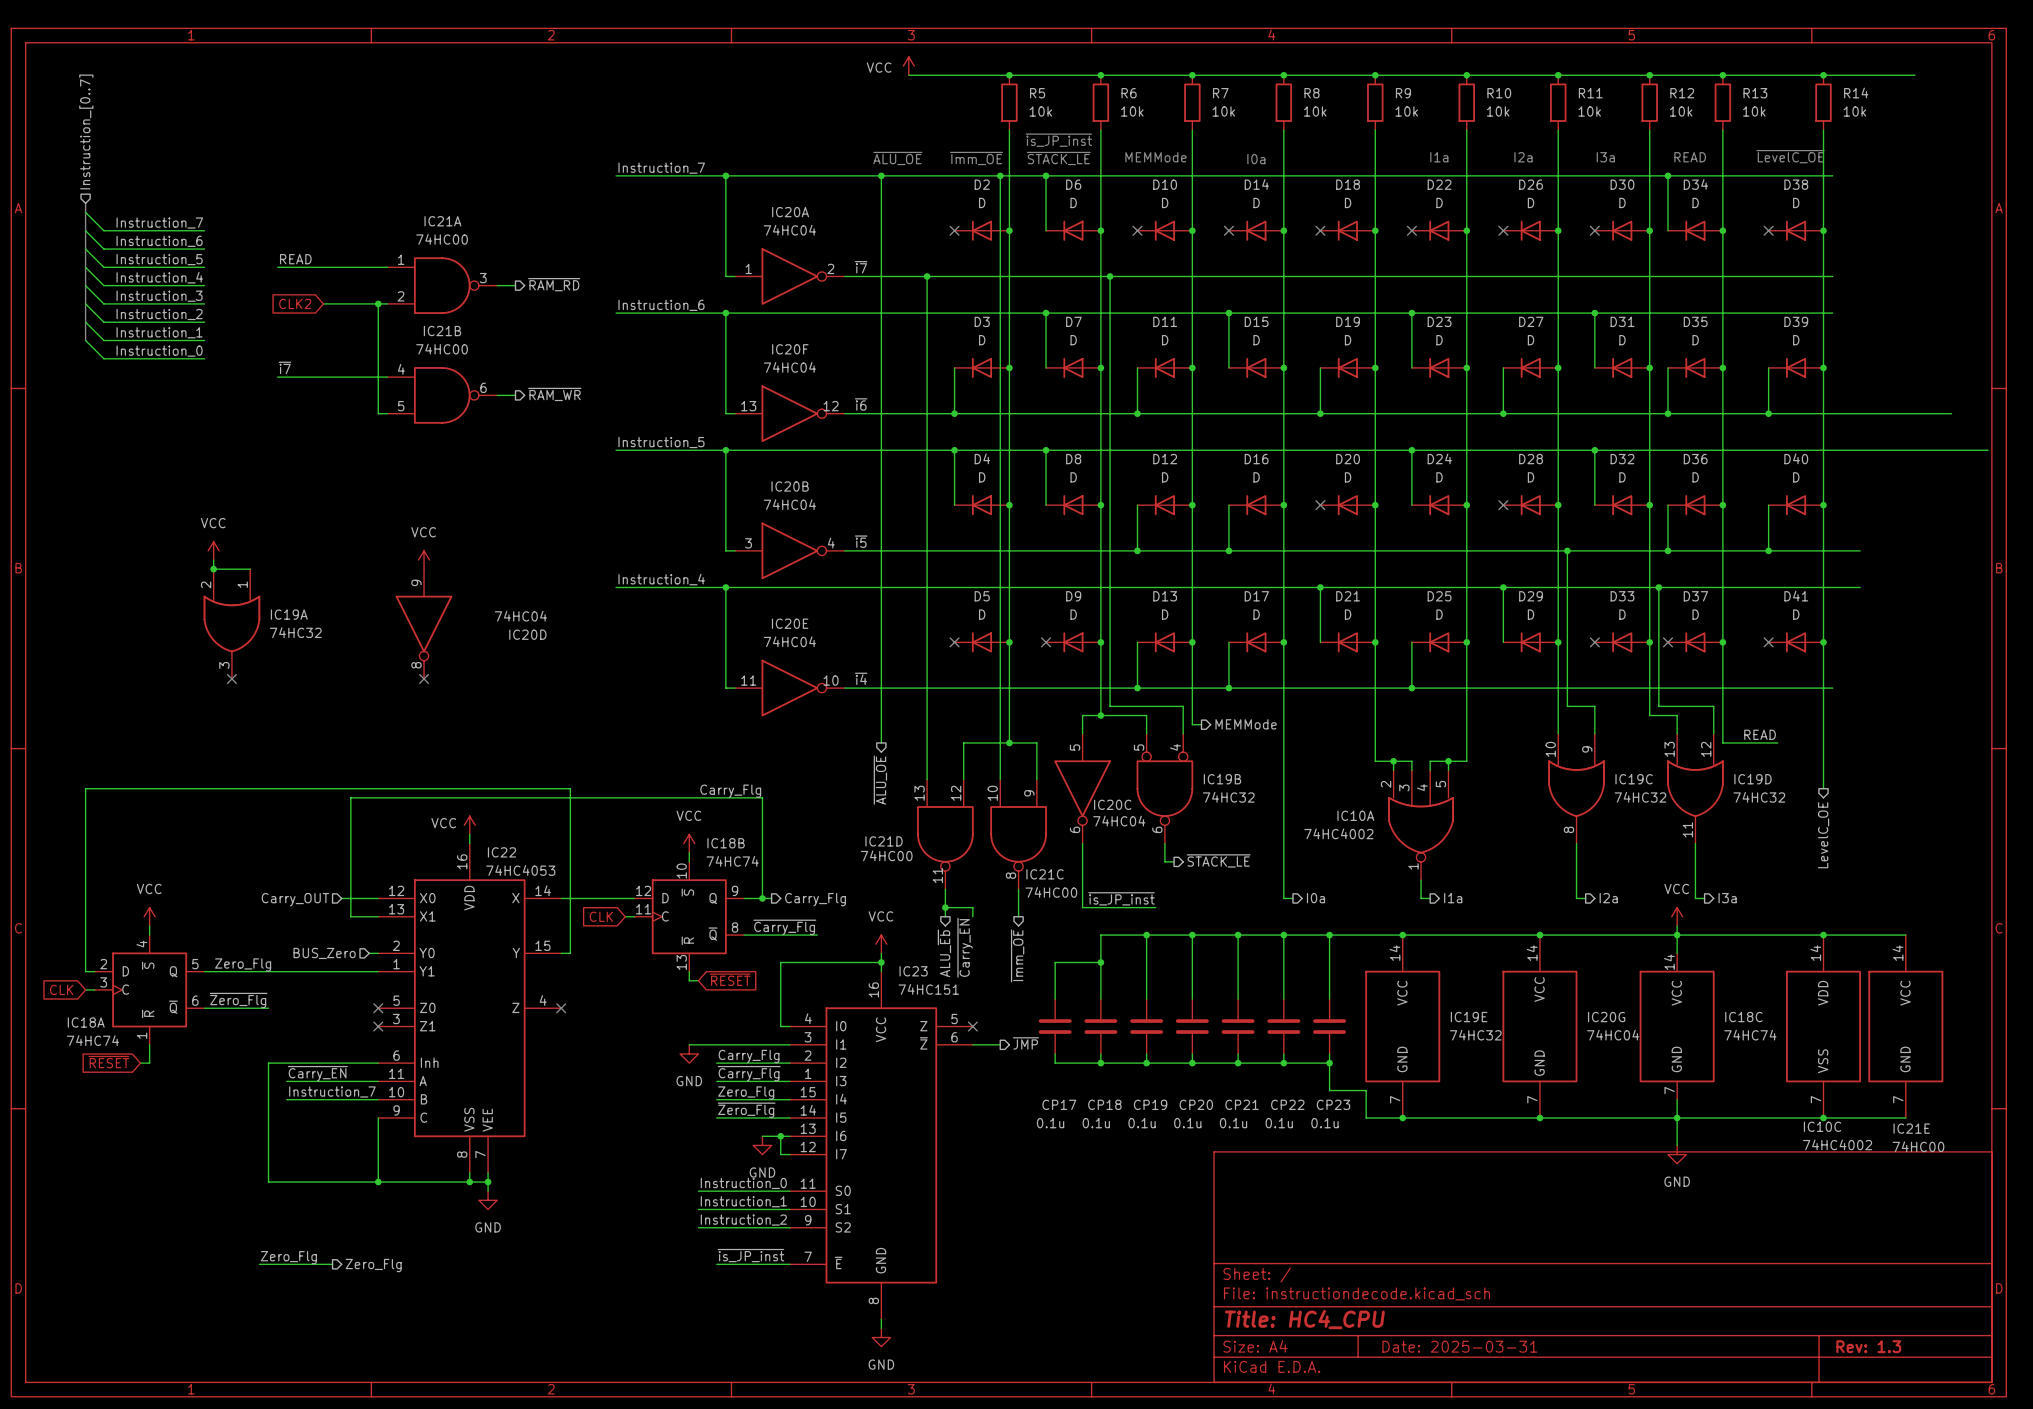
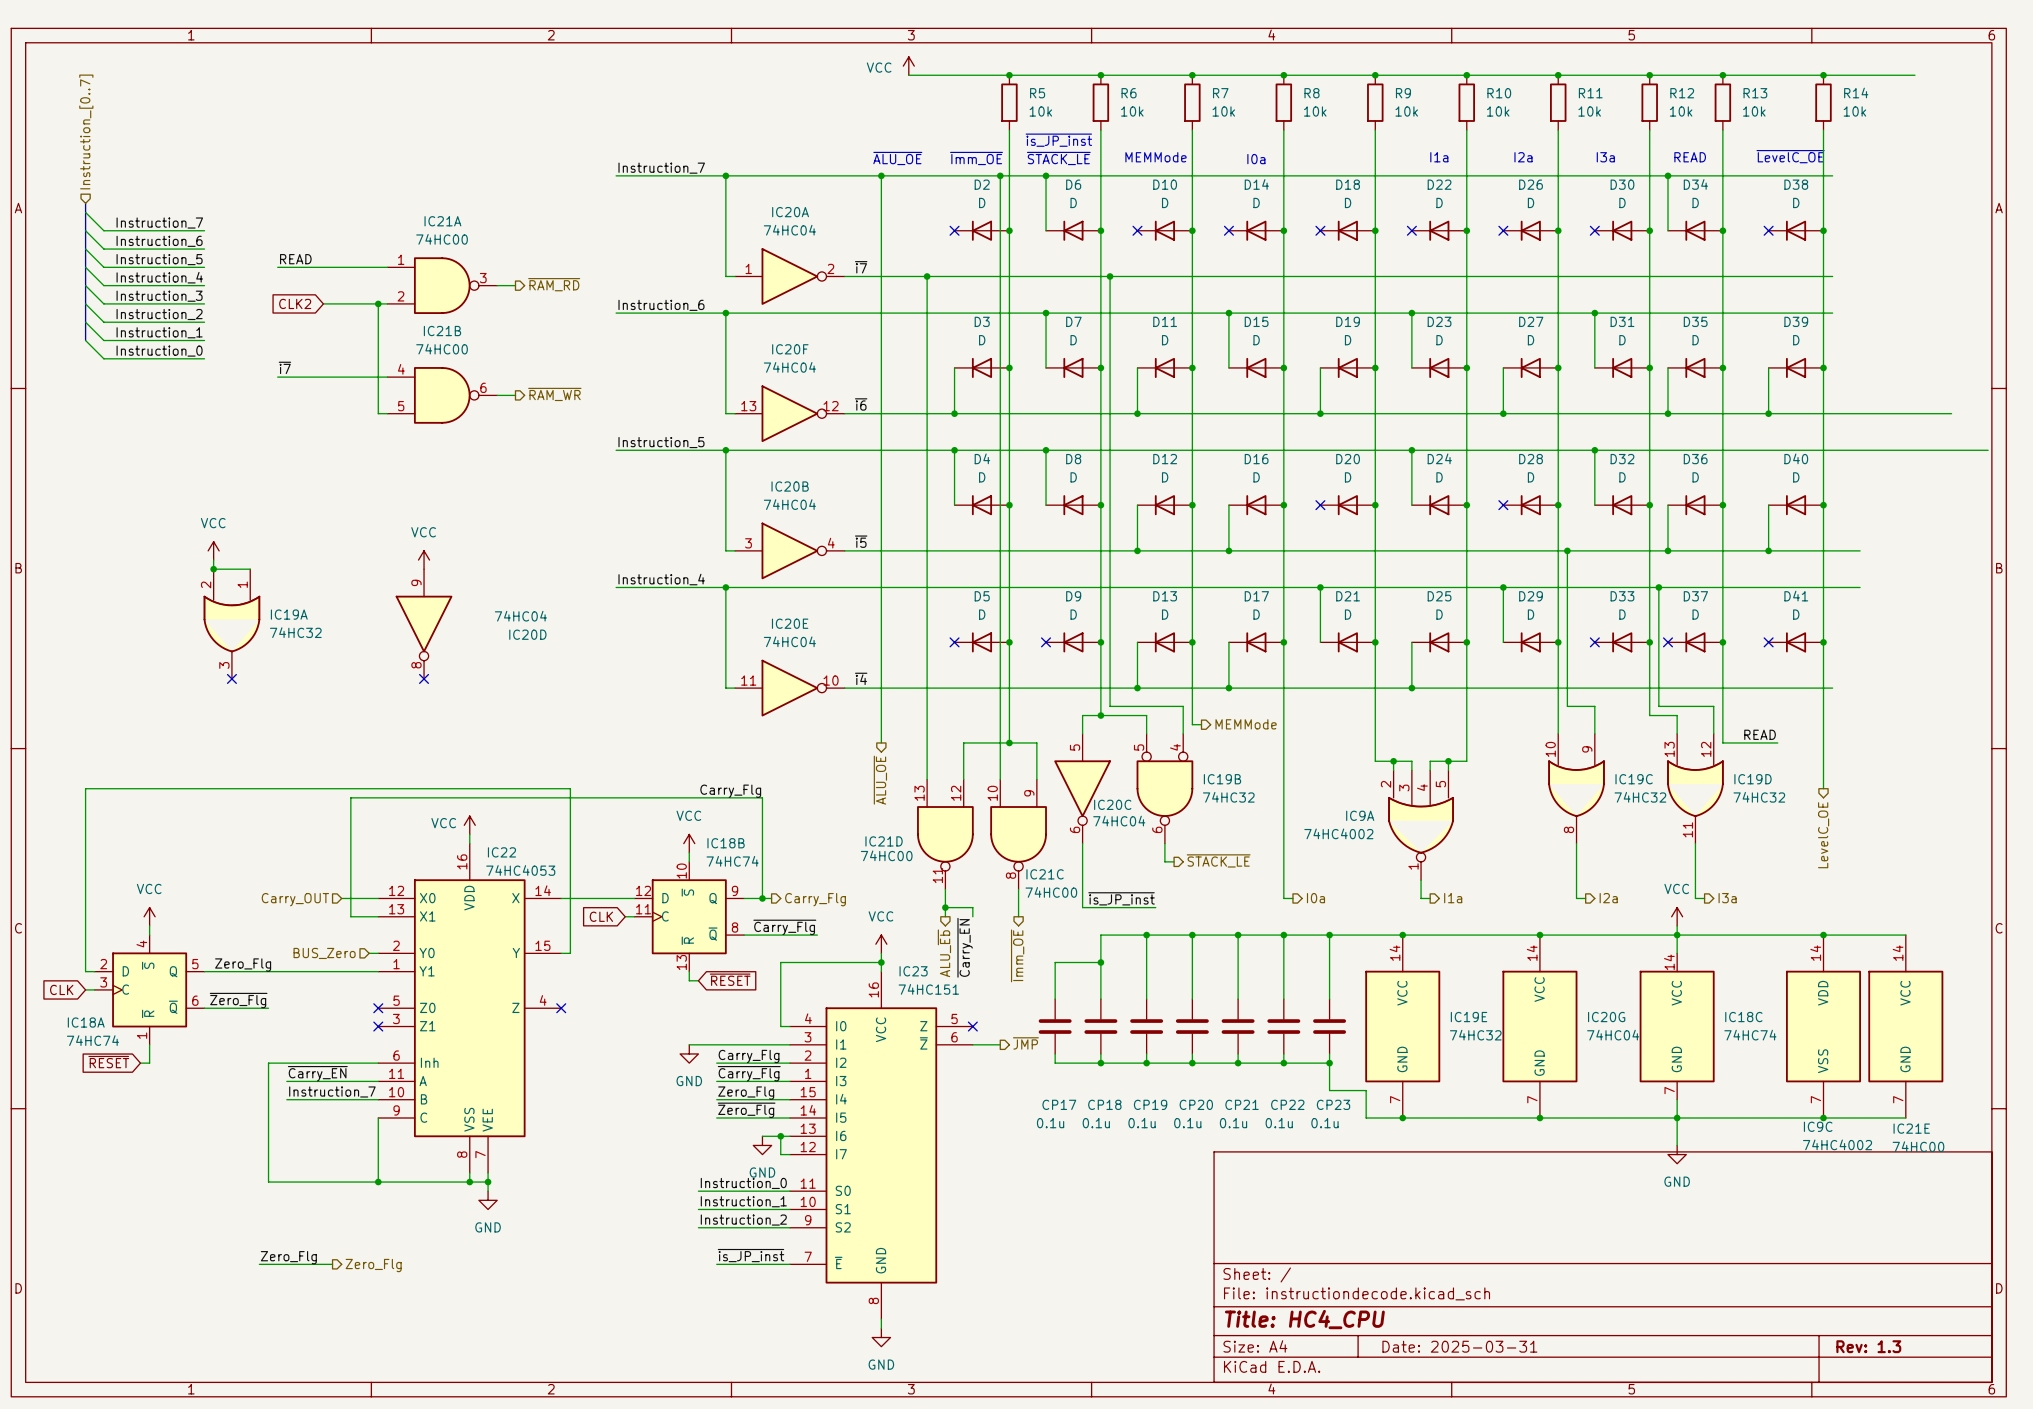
IC10A name: IC10A (1355, 815) -> IC9A (1360, 815)
IC10C name: IC10C (1822, 1126) -> IC9C (1818, 1126)

